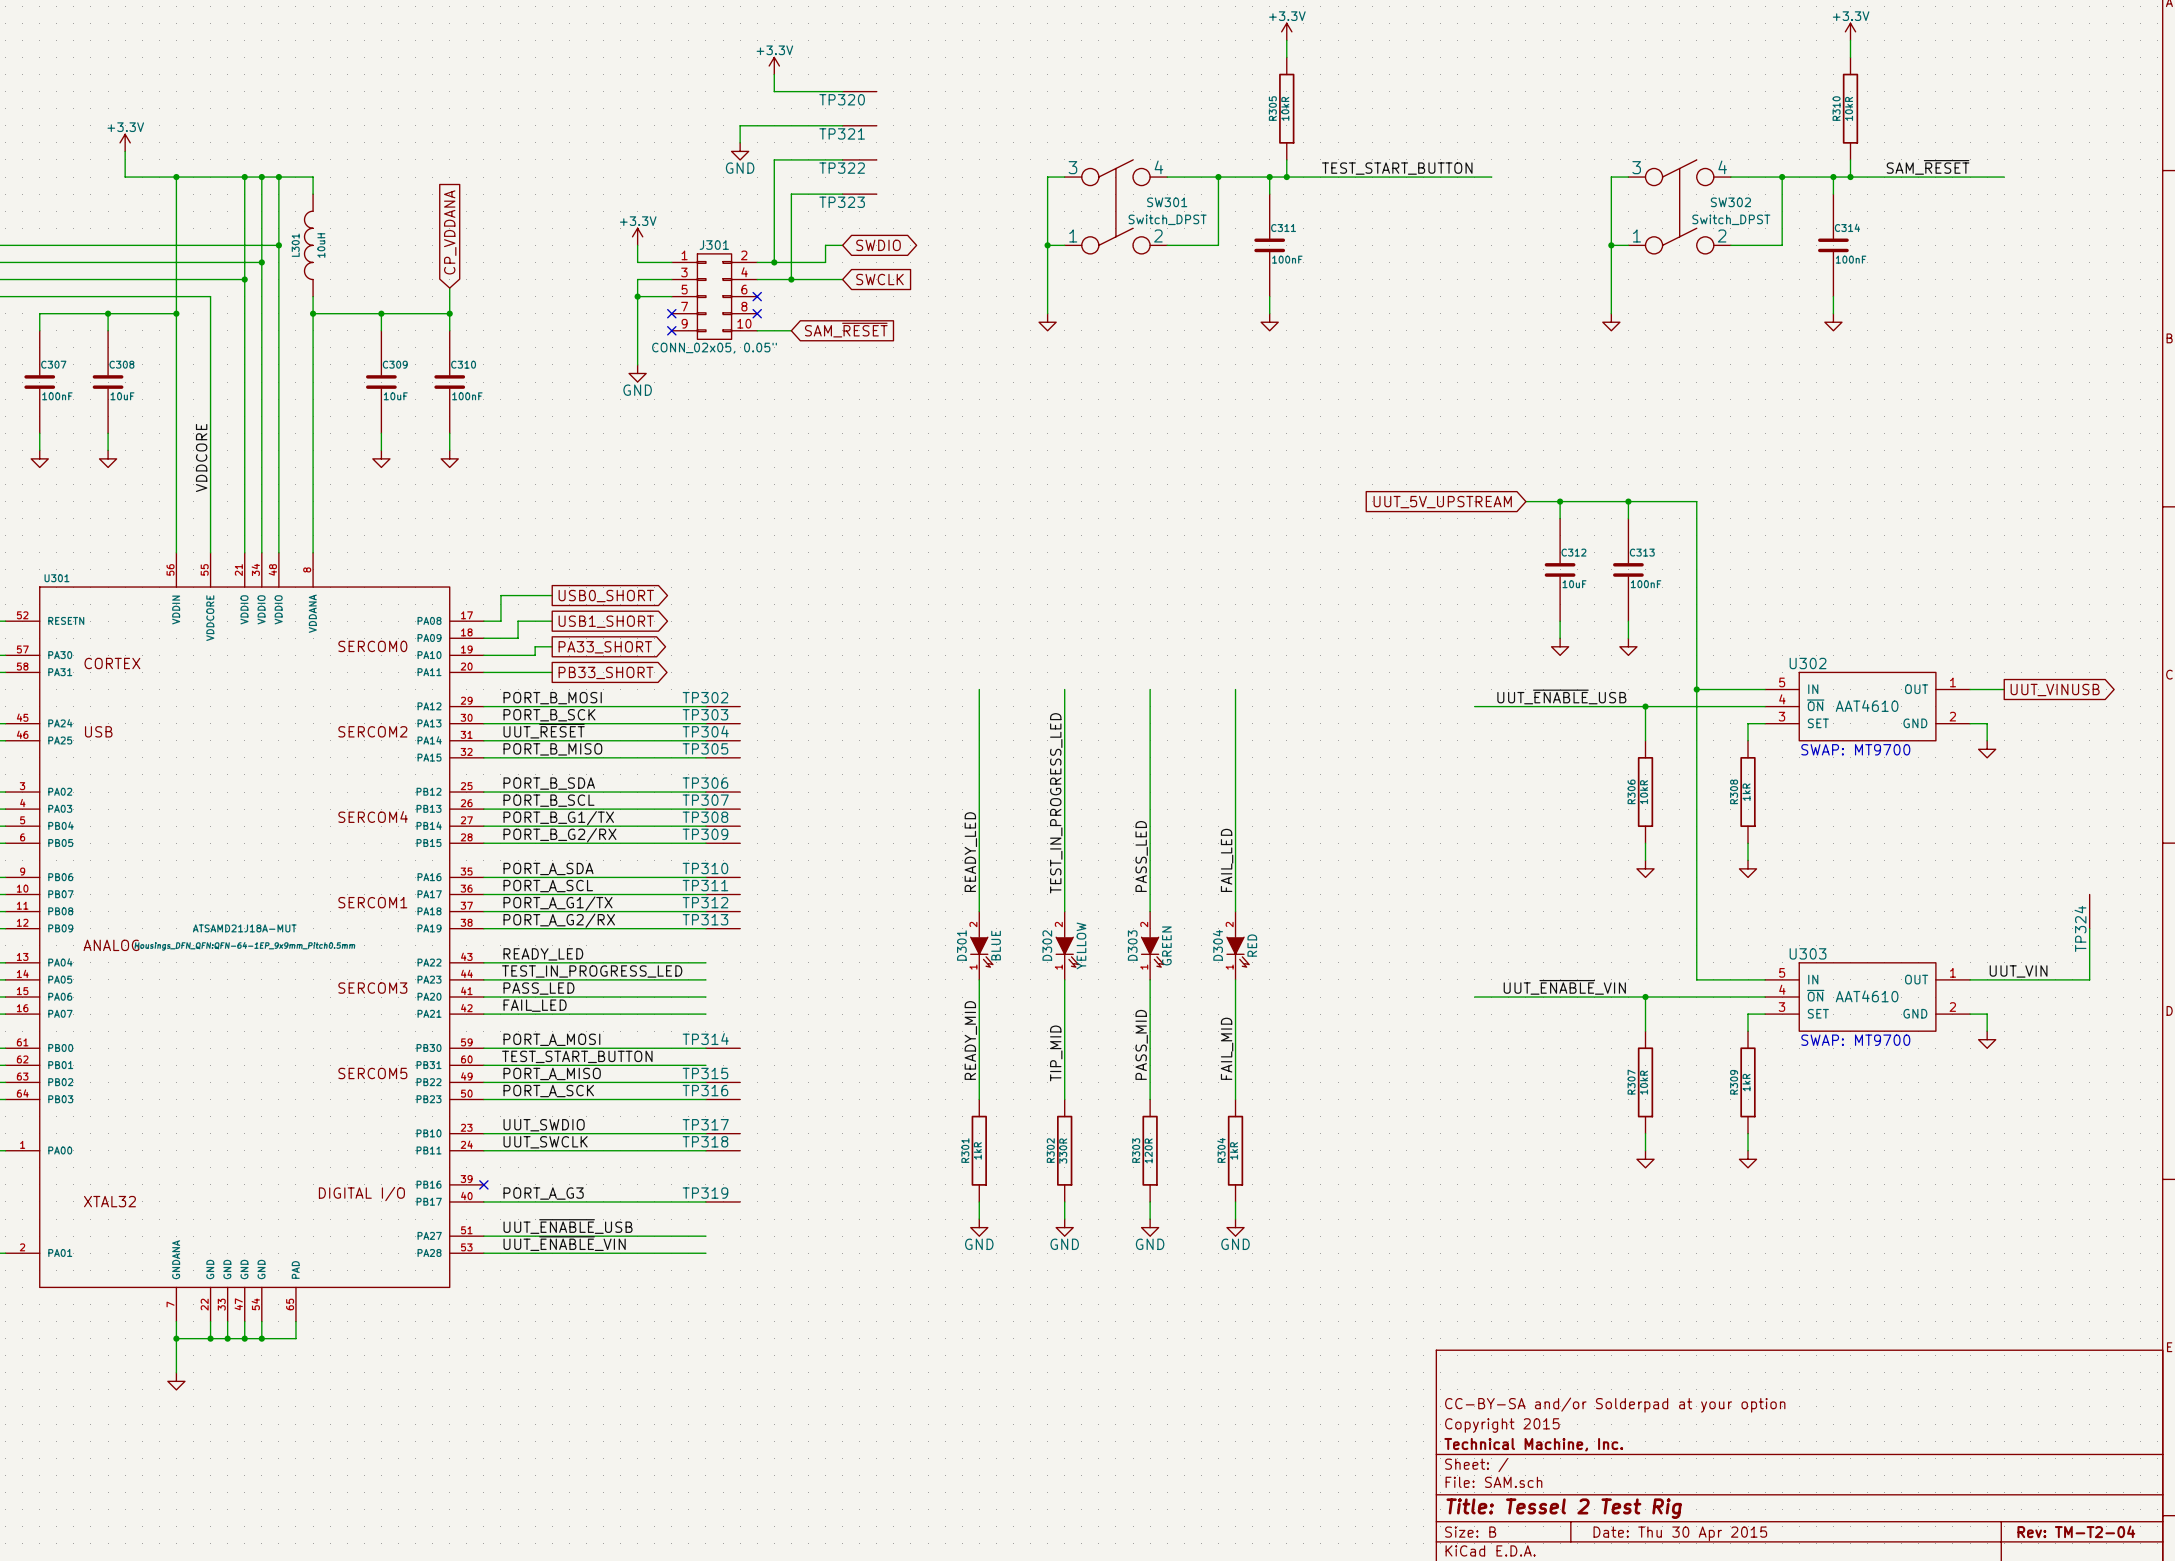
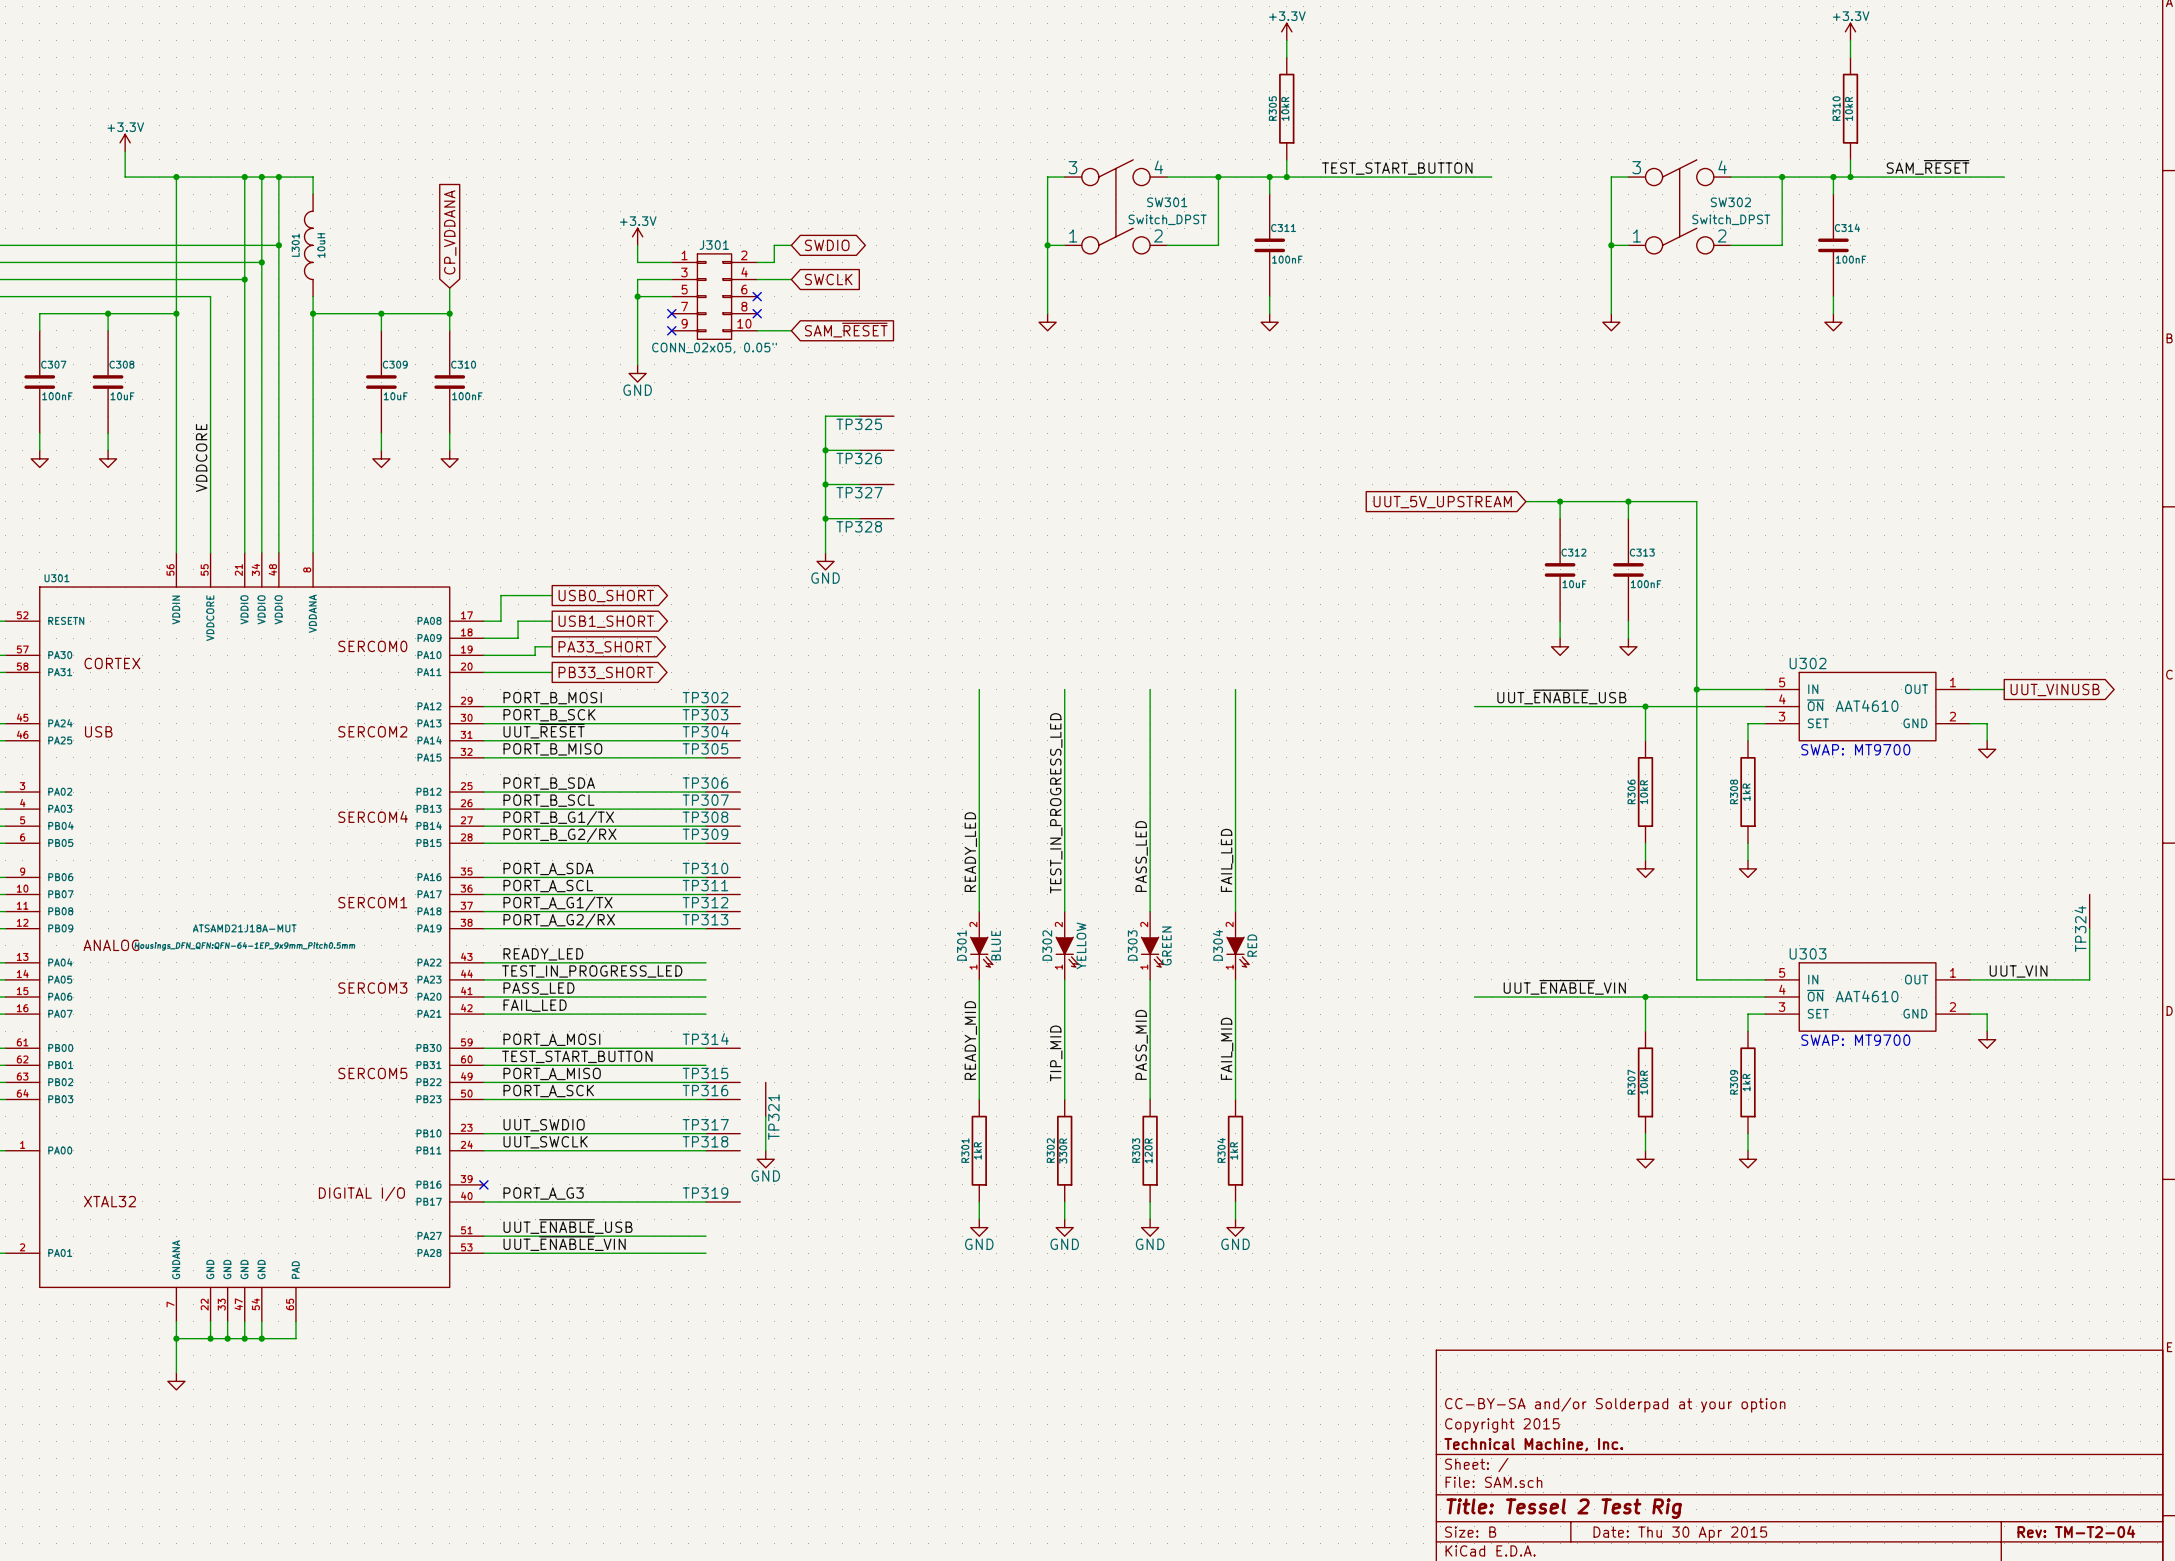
power symbol: +3.3V (774, 65) -> none
wire: (774, 74) (774, 91) (842, 91) -> none
TP320: (859, 91) -> none
wire: (842, 125) (740, 125) (740, 142) -> none
TP321 rotation: 0° (859, 125) -> 90° clockwise (765, 1099)
TP321 position: (859, 125) -> (765, 1099)
TP321 name position: TP321 (842, 133) -> TP321 (773, 1117)
power symbol: GND (740, 151) -> none
wire: (842, 159) (774, 159) (774, 245) -> (791, 245) (774, 245)
TP322: (859, 159) -> none
wire: (842, 194) (791, 194) (791, 279) (842, 279) -> none
TP323: (859, 194) -> none
wire: (842, 245) (825, 245) (825, 262) (774, 262) -> none
global label position: SWDIO (878, 245) -> SWDIO (827, 245)
junction: (774, 262) -> none
junction: (791, 279) -> none
global label position: SWCLK (879, 279) -> SWCLK (828, 279)
wire: none -> (859, 416) (825, 416) (825, 552)
TP325: none -> (876, 416)
wire: none -> (825, 450) (859, 450)
junction: none -> (825, 450)
TP326: none -> (876, 450)
wire: none -> (825, 484) (859, 484)
junction: none -> (825, 484)
TP327: none -> (876, 484)
wire: none -> (825, 518) (859, 518)
junction: none -> (825, 518)
TP328: none -> (876, 518)
power symbol: none -> GND (825, 561)
wire: none -> (765, 1116) (765, 1150)
power symbol: none -> GND (765, 1159)

